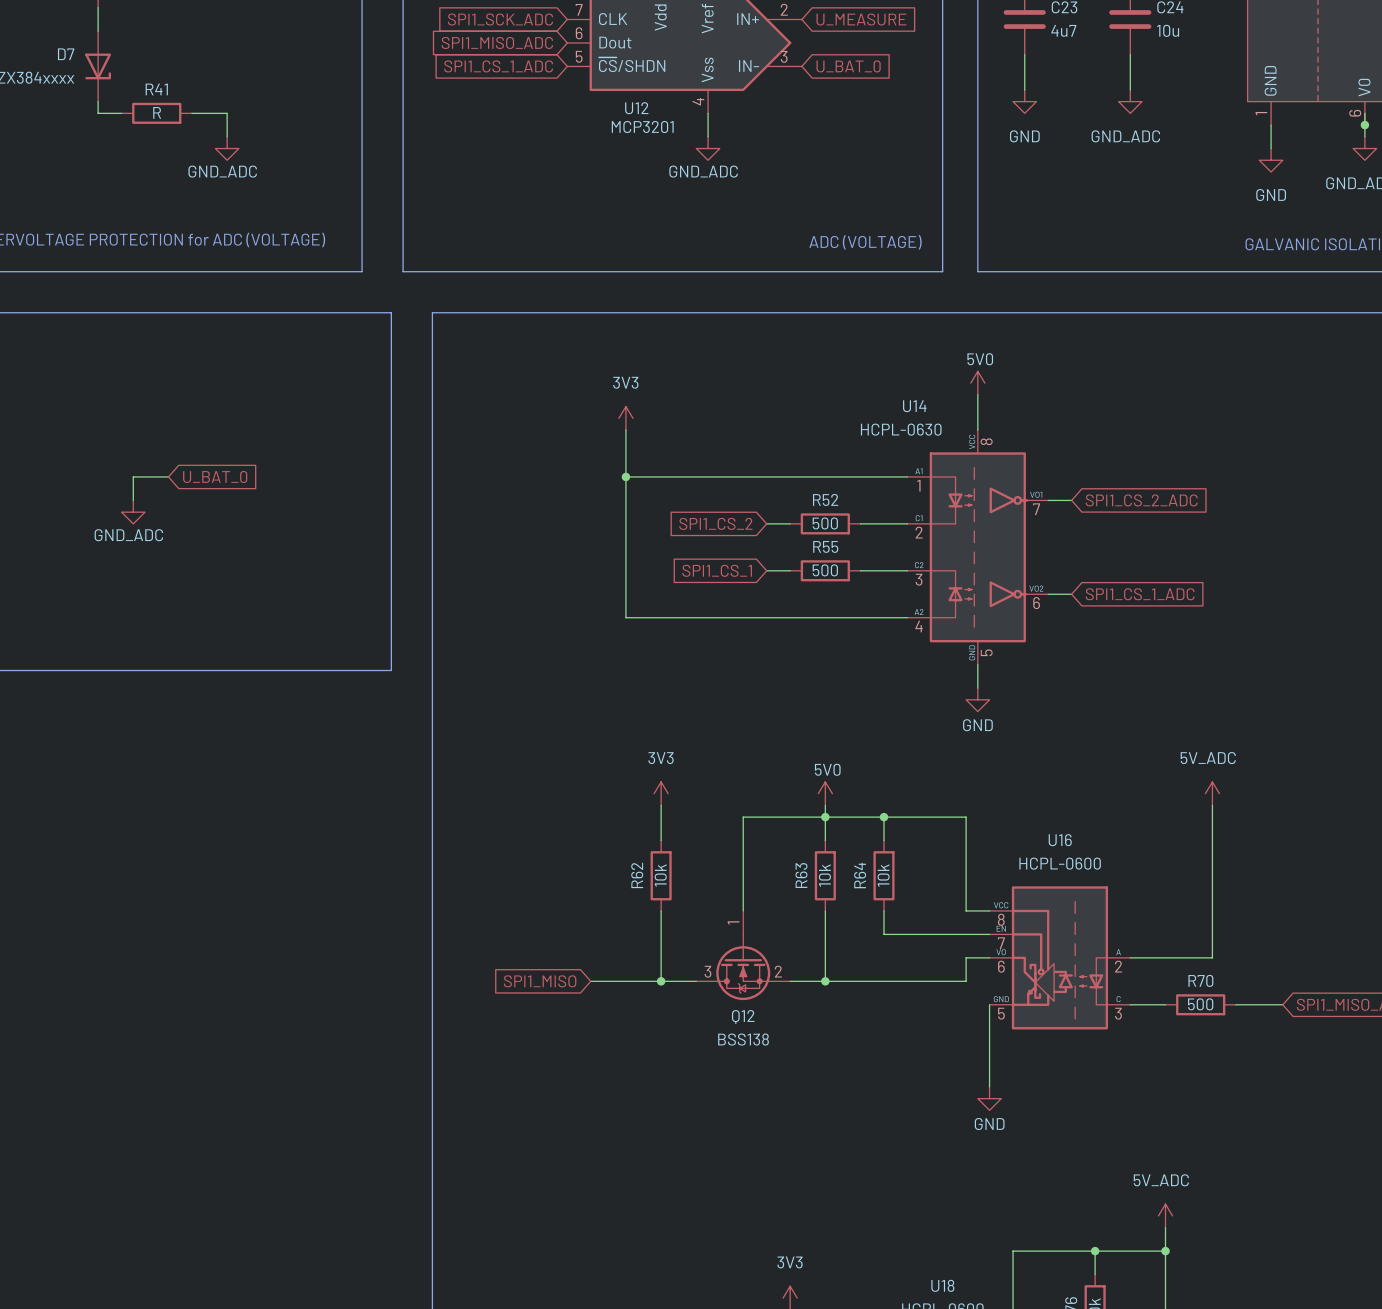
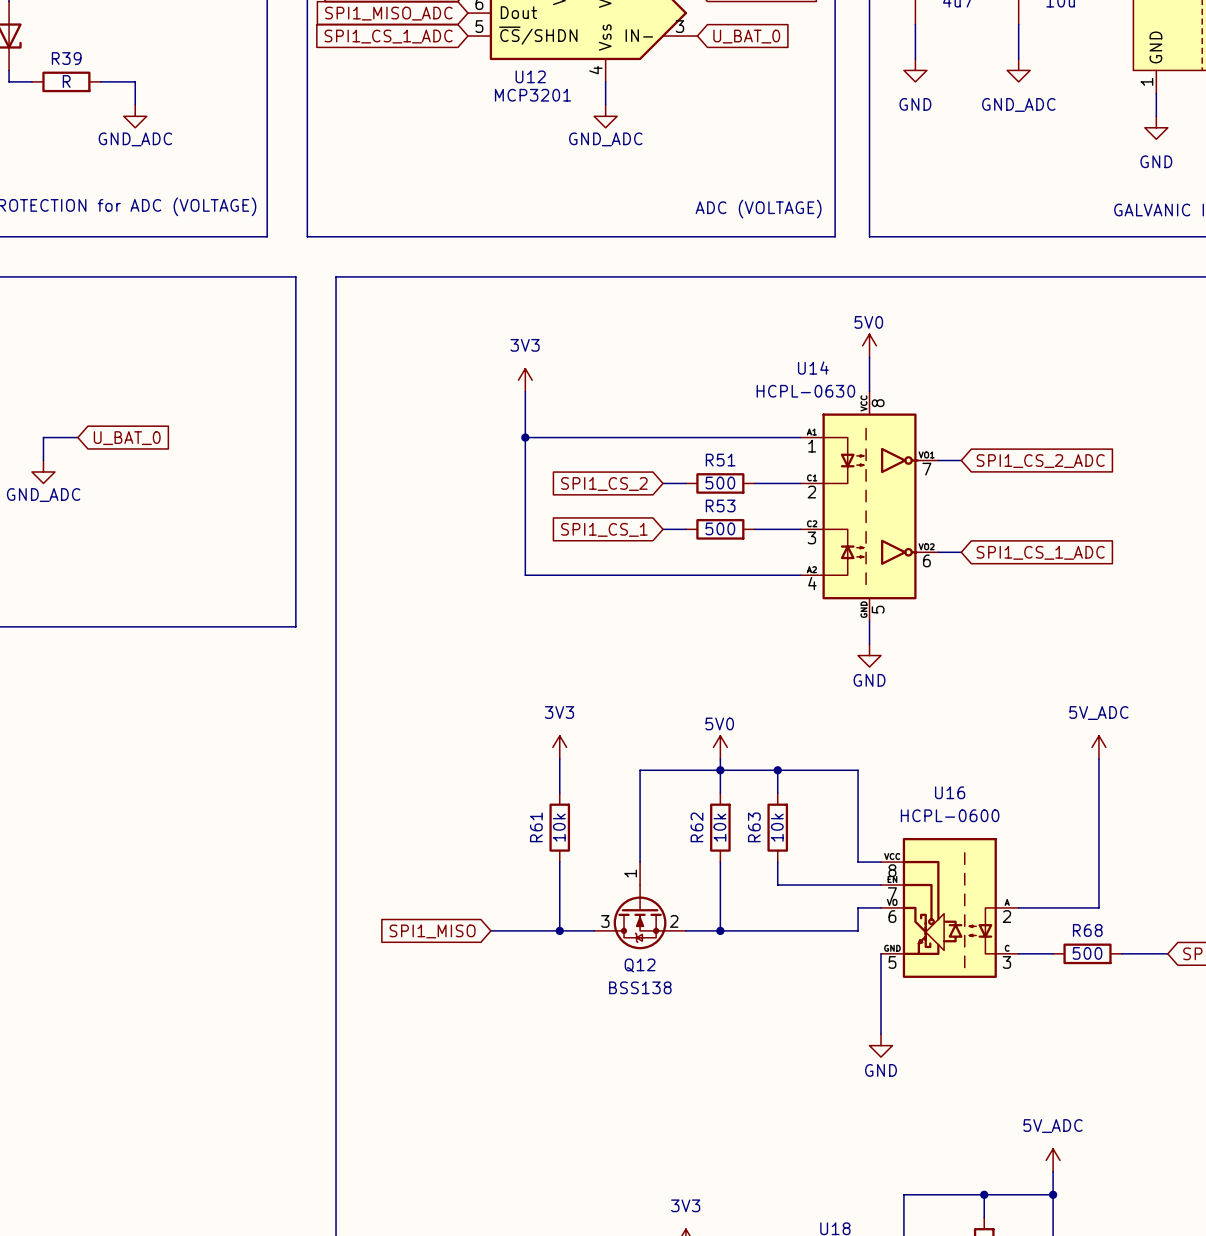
R41 name: R41 (156, 89) -> R39 (66, 58)
R52 name: R52 (825, 499) -> R51 (720, 460)
R55 name: R55 (825, 546) -> R53 (720, 505)
R62 name: R62 (637, 875) -> R61 (536, 827)
R63 name: R63 (801, 875) -> R62 (696, 827)
R64 name: R64 (860, 875) -> R63 (754, 827)
R70 name: R70 (1200, 980) -> R68 (1087, 930)

